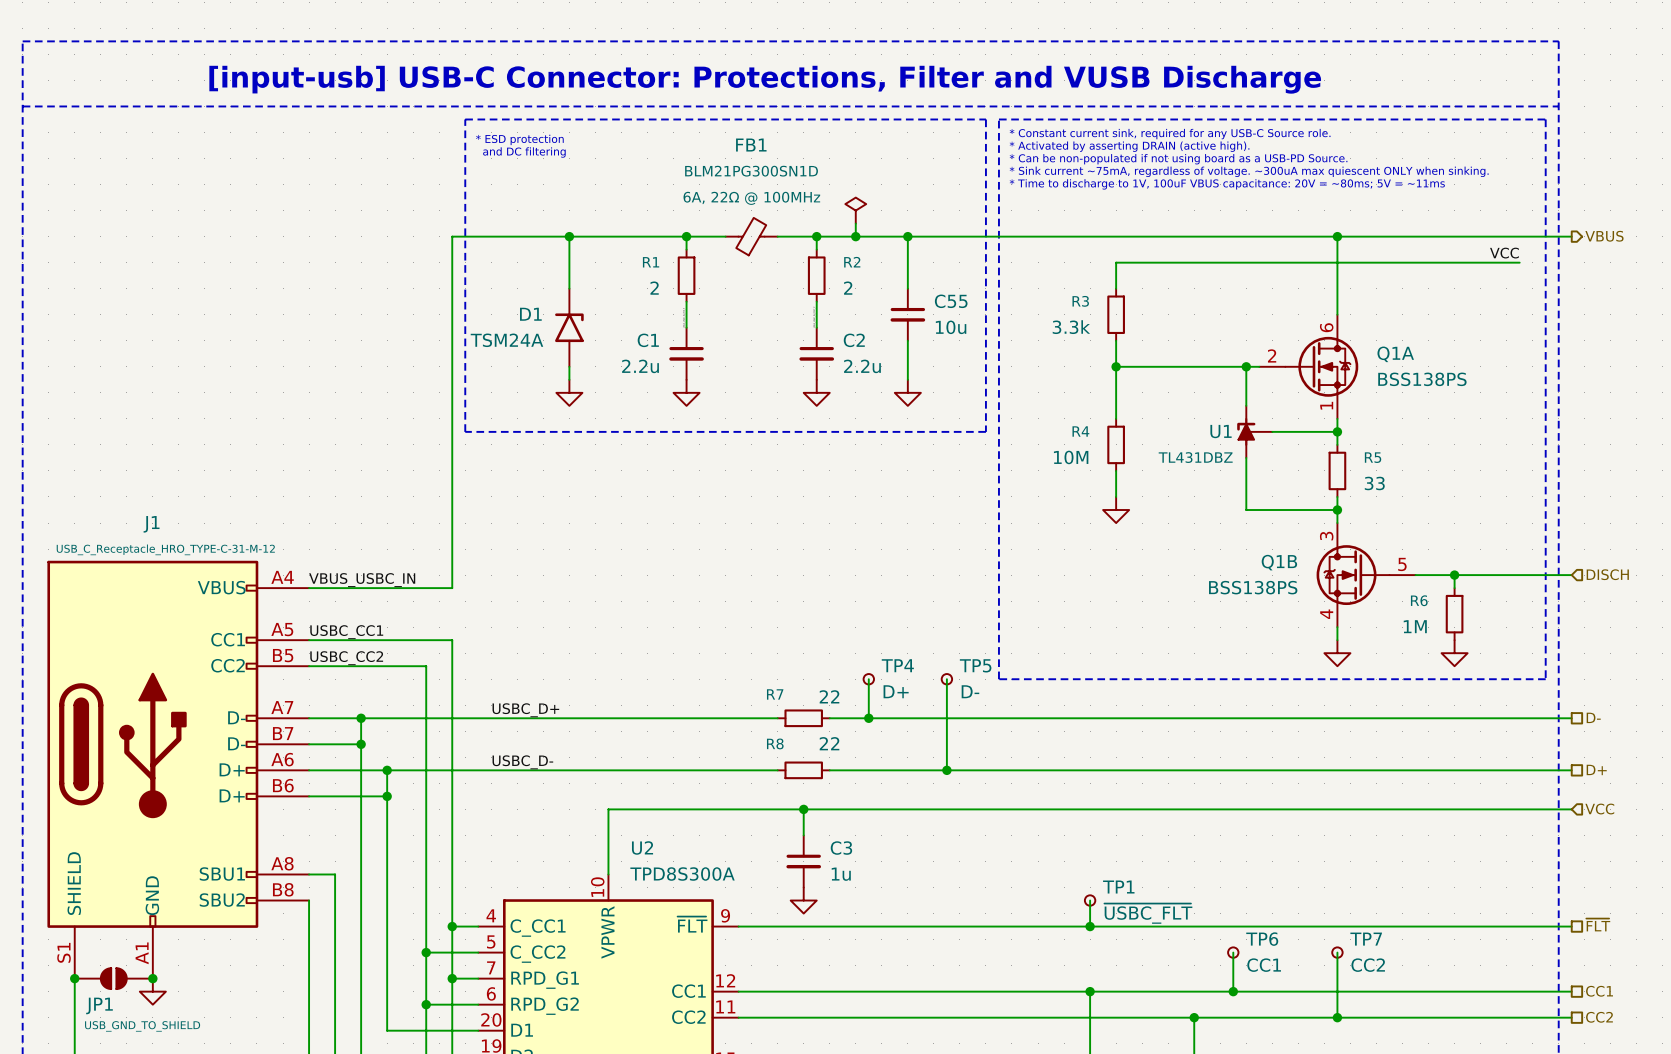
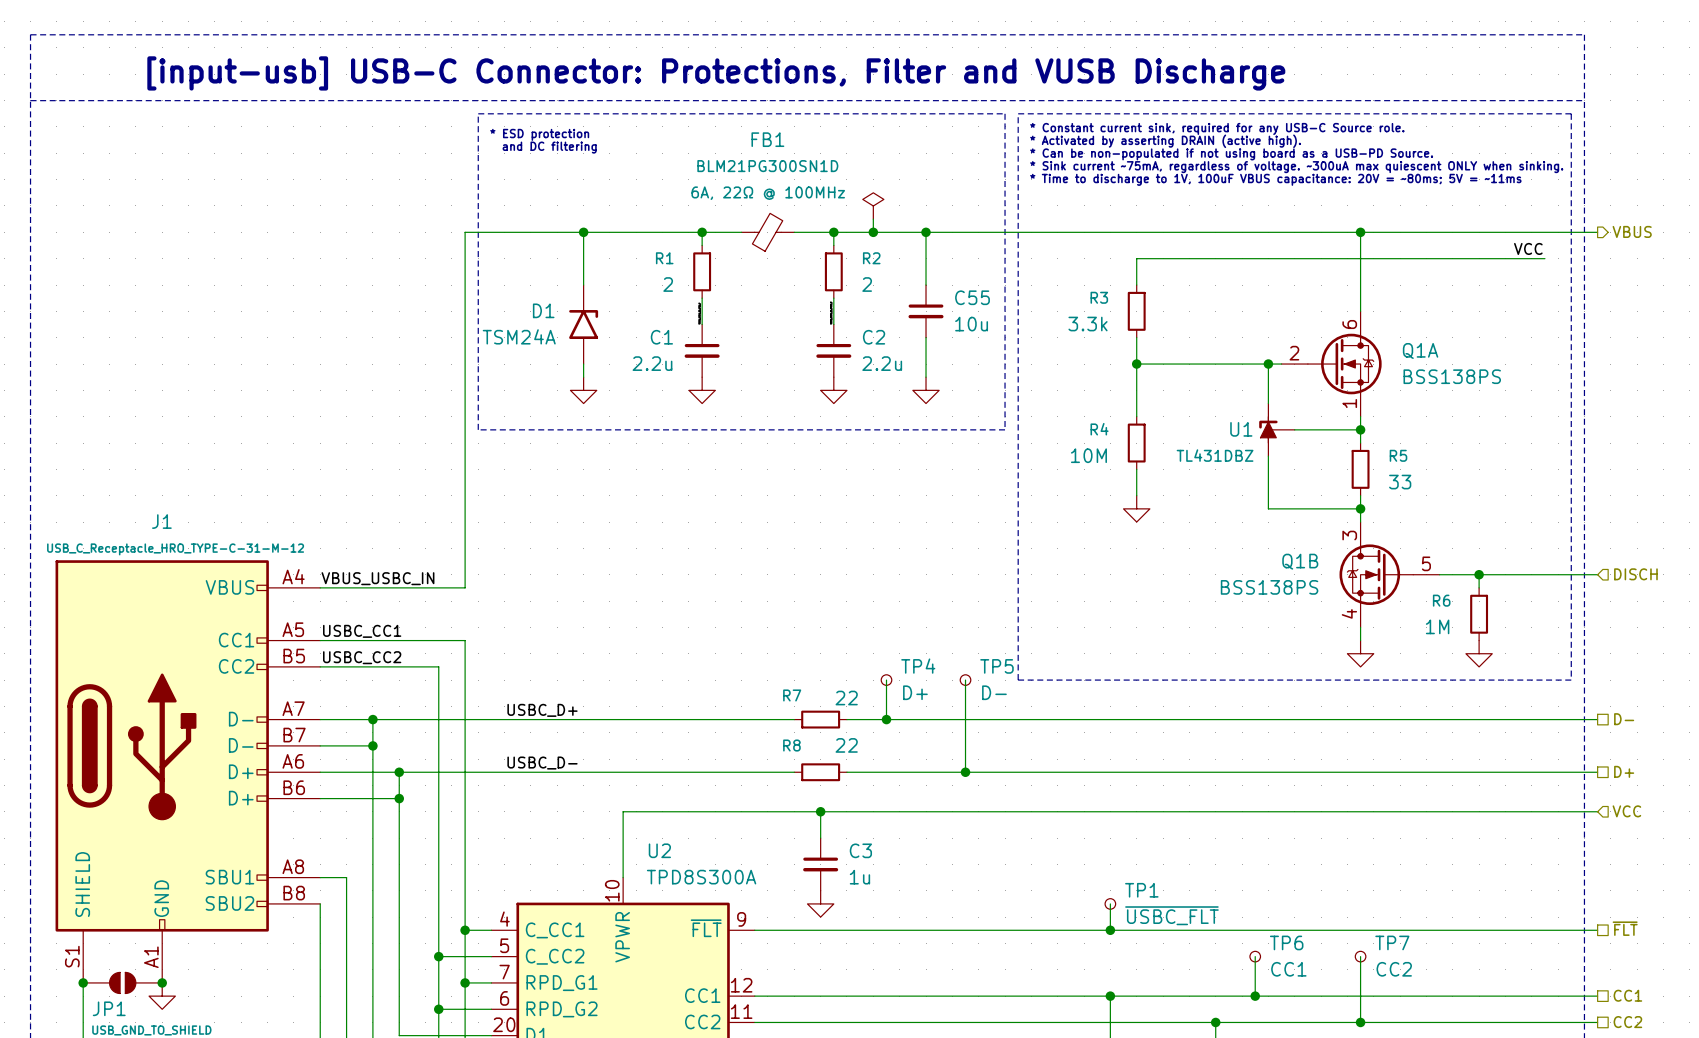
text position: [input-usb] USB-C Connector: Protections, Filter and VUSB Discharge (765, 79) -> [input-usb] USB-C Connector: Protections, Filter and VUSB Discharge (716, 73)

